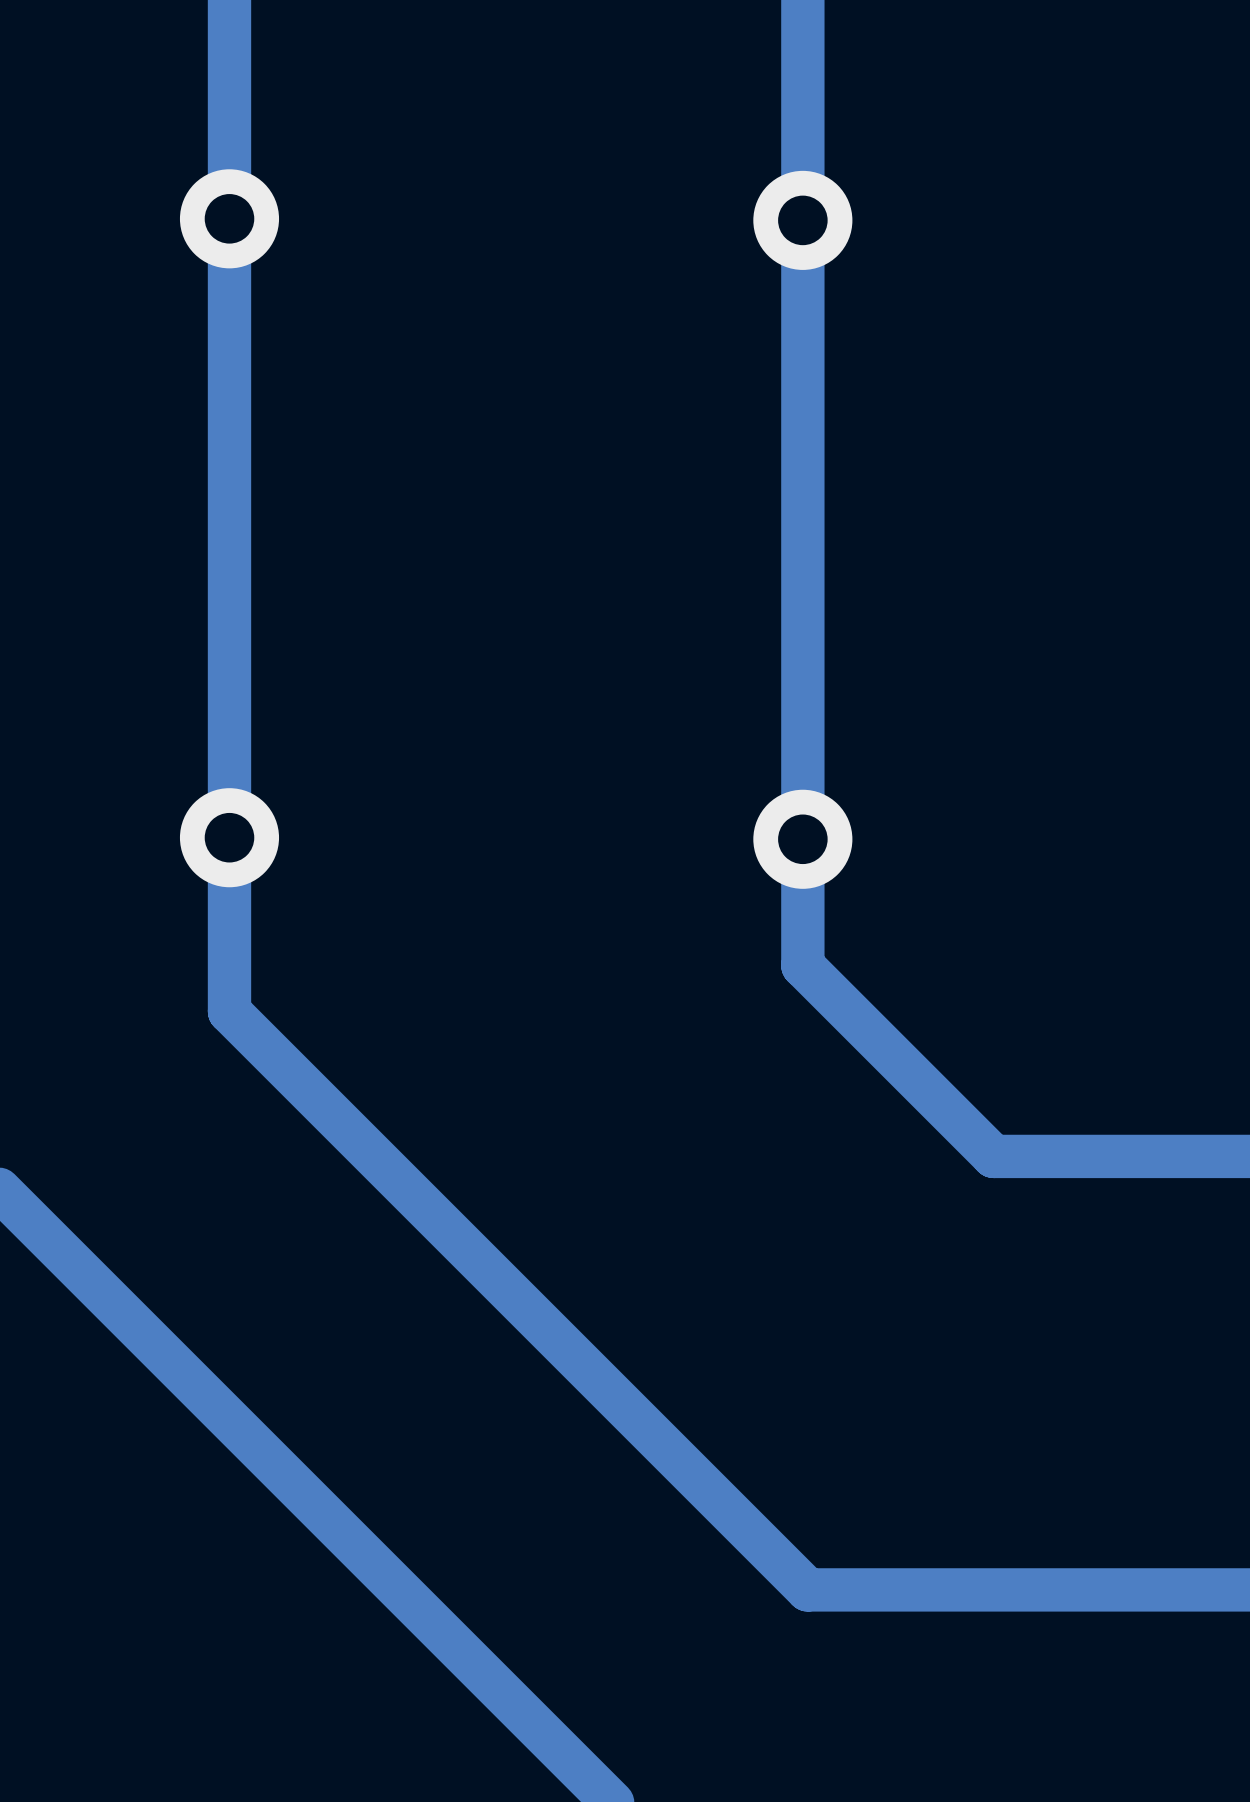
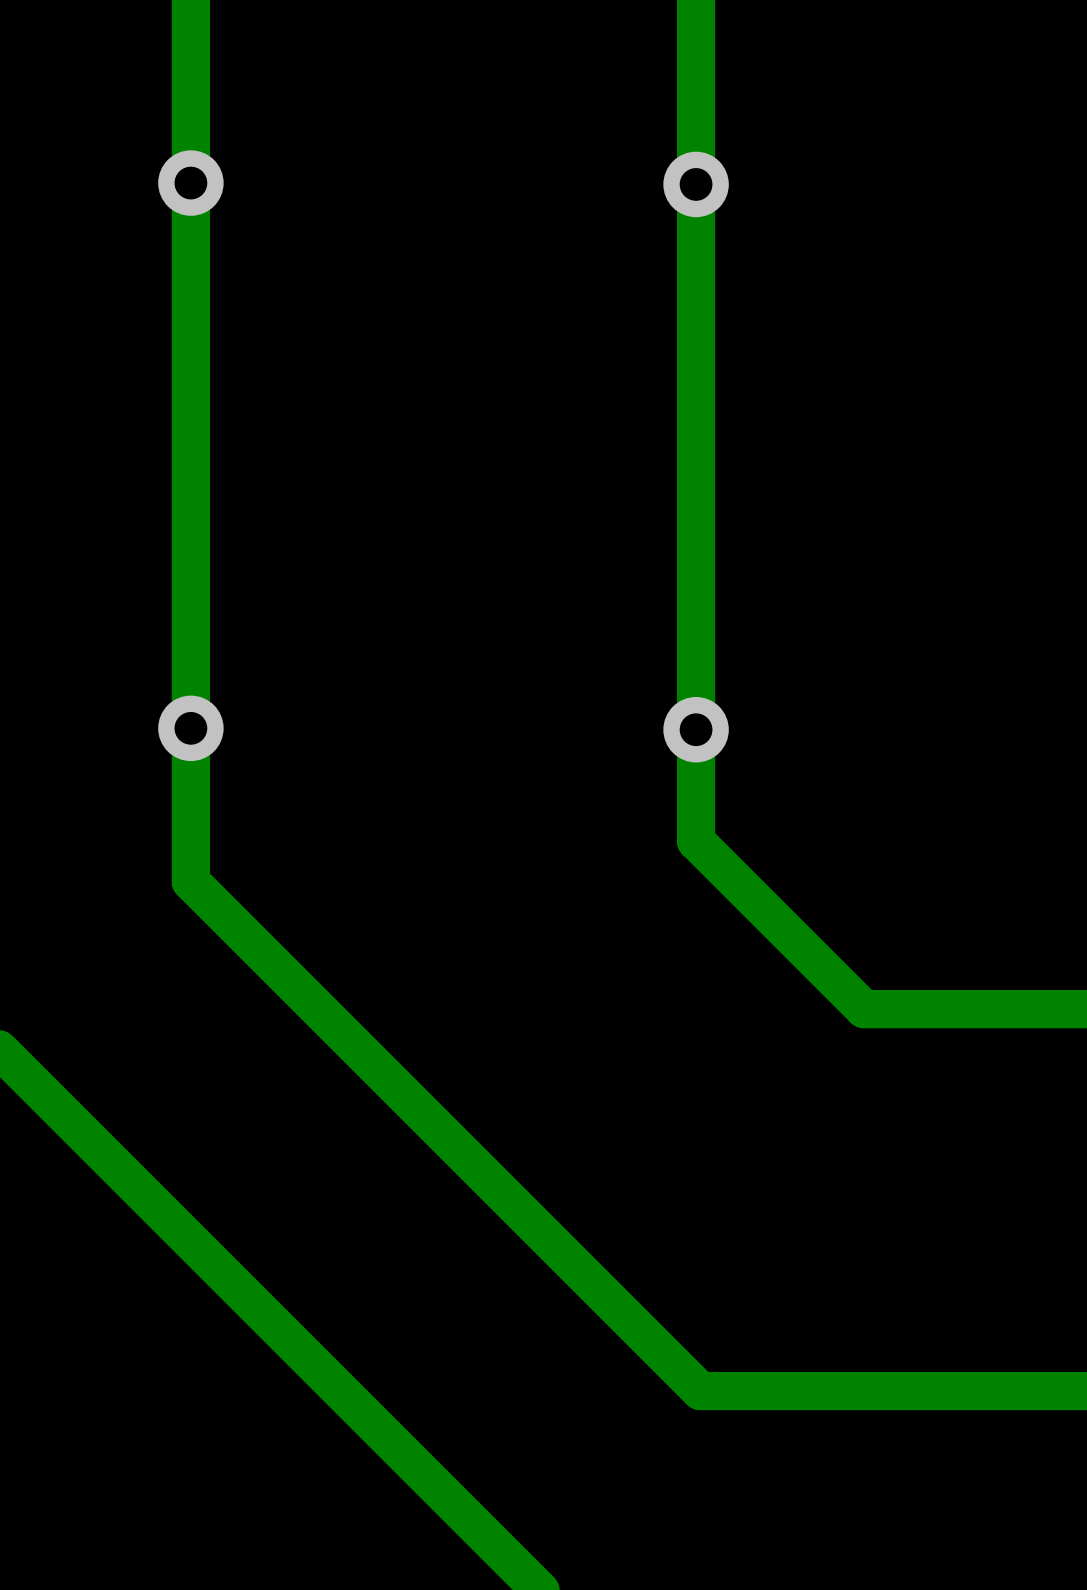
via size: [179, 169, 280, 269] -> [158, 150, 224, 216]
via size: [753, 170, 853, 270] -> [663, 151, 729, 218]
via size: [179, 788, 280, 888] -> [158, 695, 224, 762]
via size: [753, 789, 853, 889] -> [663, 696, 729, 763]

